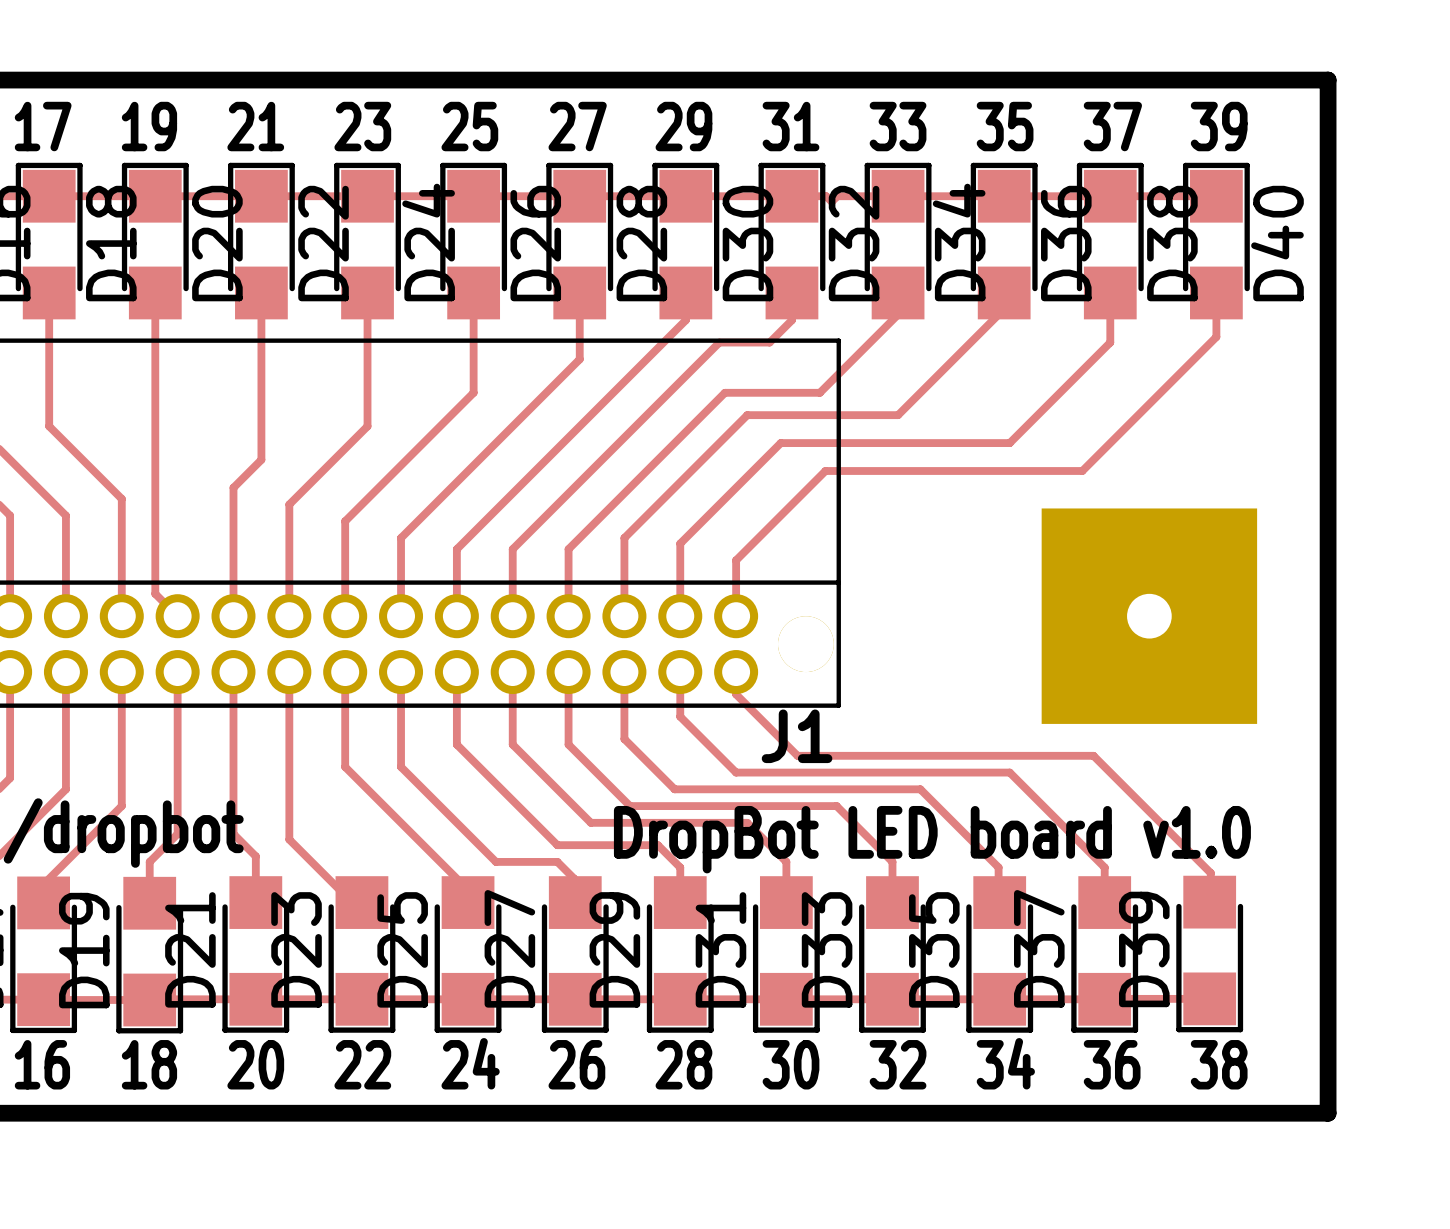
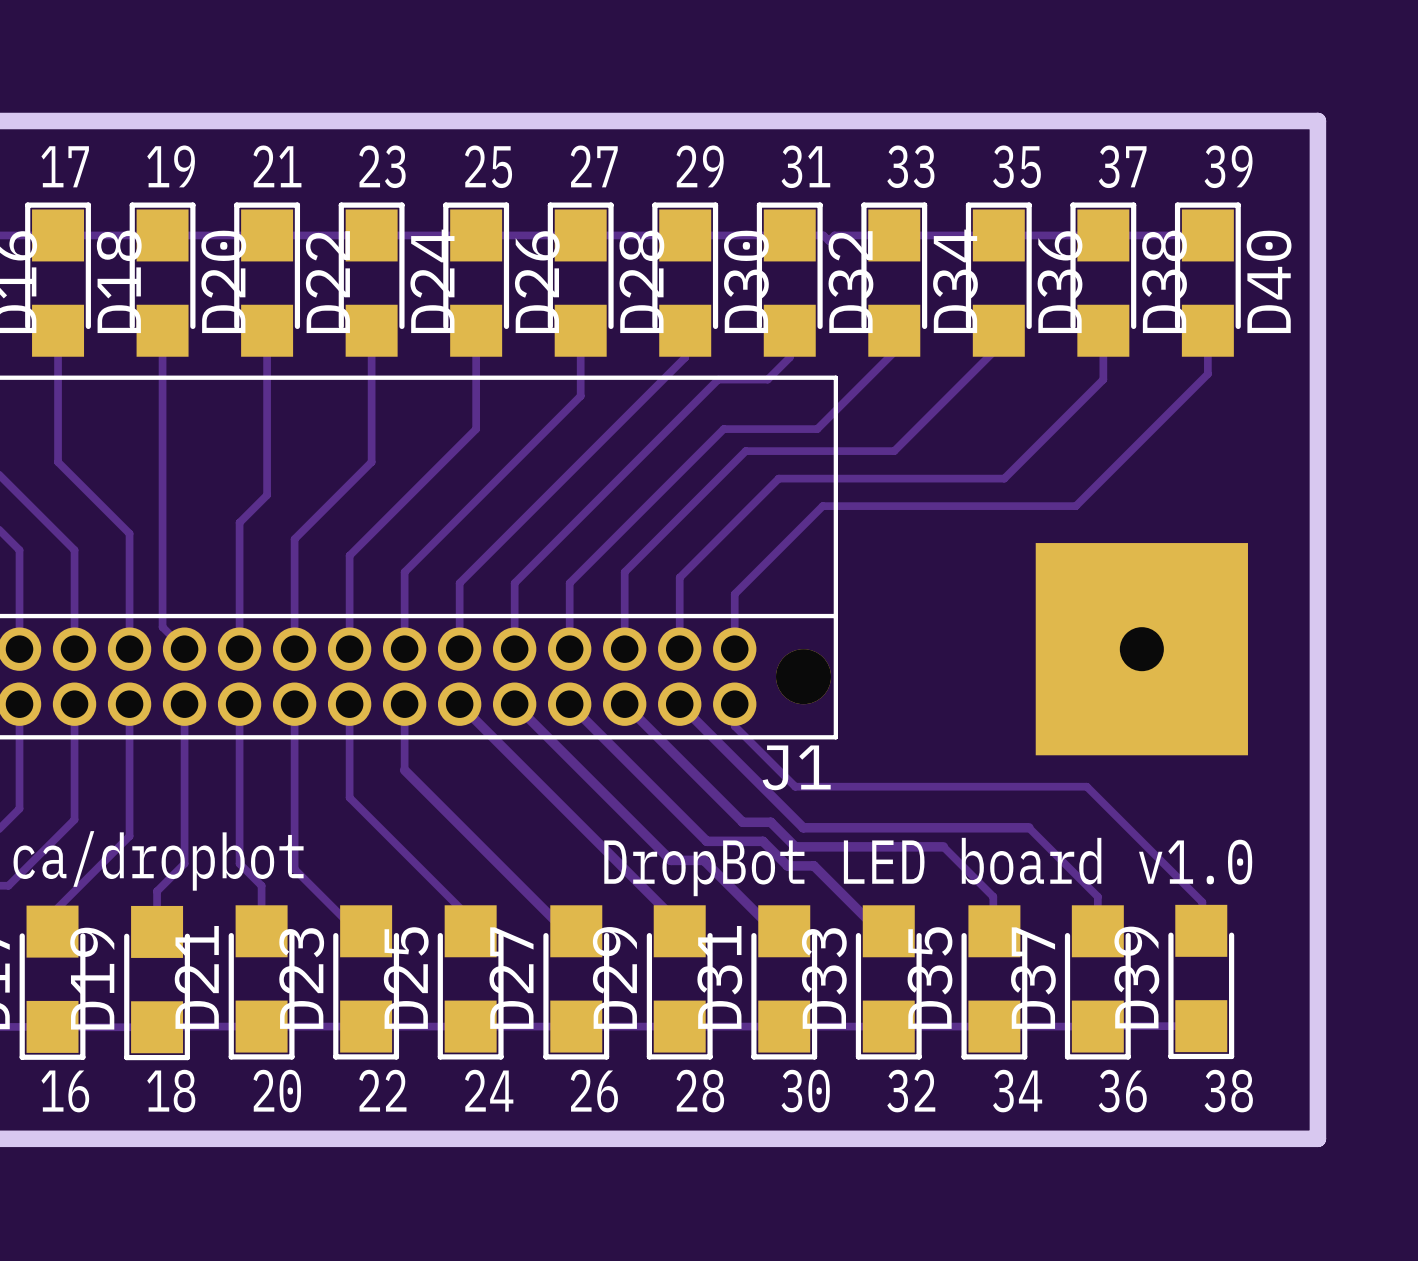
track: (456, 672) (456, 744) (557, 845) (657, 845) (680, 867) (680, 895) -> (459, 704) (679, 924)
track: (512, 672) (512, 744) (590, 822) (747, 822) (786, 861) (786, 912) -> (514, 704) (670, 860) (703, 860) (784, 940)
track: (568, 672) (568, 744) (630, 806) (836, 806) (892, 861) (892, 912) -> (569, 704) (706, 841) (762, 841) (787, 865) (813, 865) (888, 940)
track: (624, 672) (624, 739) (674, 789) (920, 789) (947, 816) -> (624, 704) (742, 822) (770, 822) (795, 846) (943, 846)
track: (680, 672) (680, 716) (736, 772) (1009, 772) (1034, 797) -> (679, 704) (803, 827) (1028, 827)
track: (401, 739) (401, 766) (495, 861) (557, 861) (574, 878) (574, 912) -> (404, 770) (575, 940)

